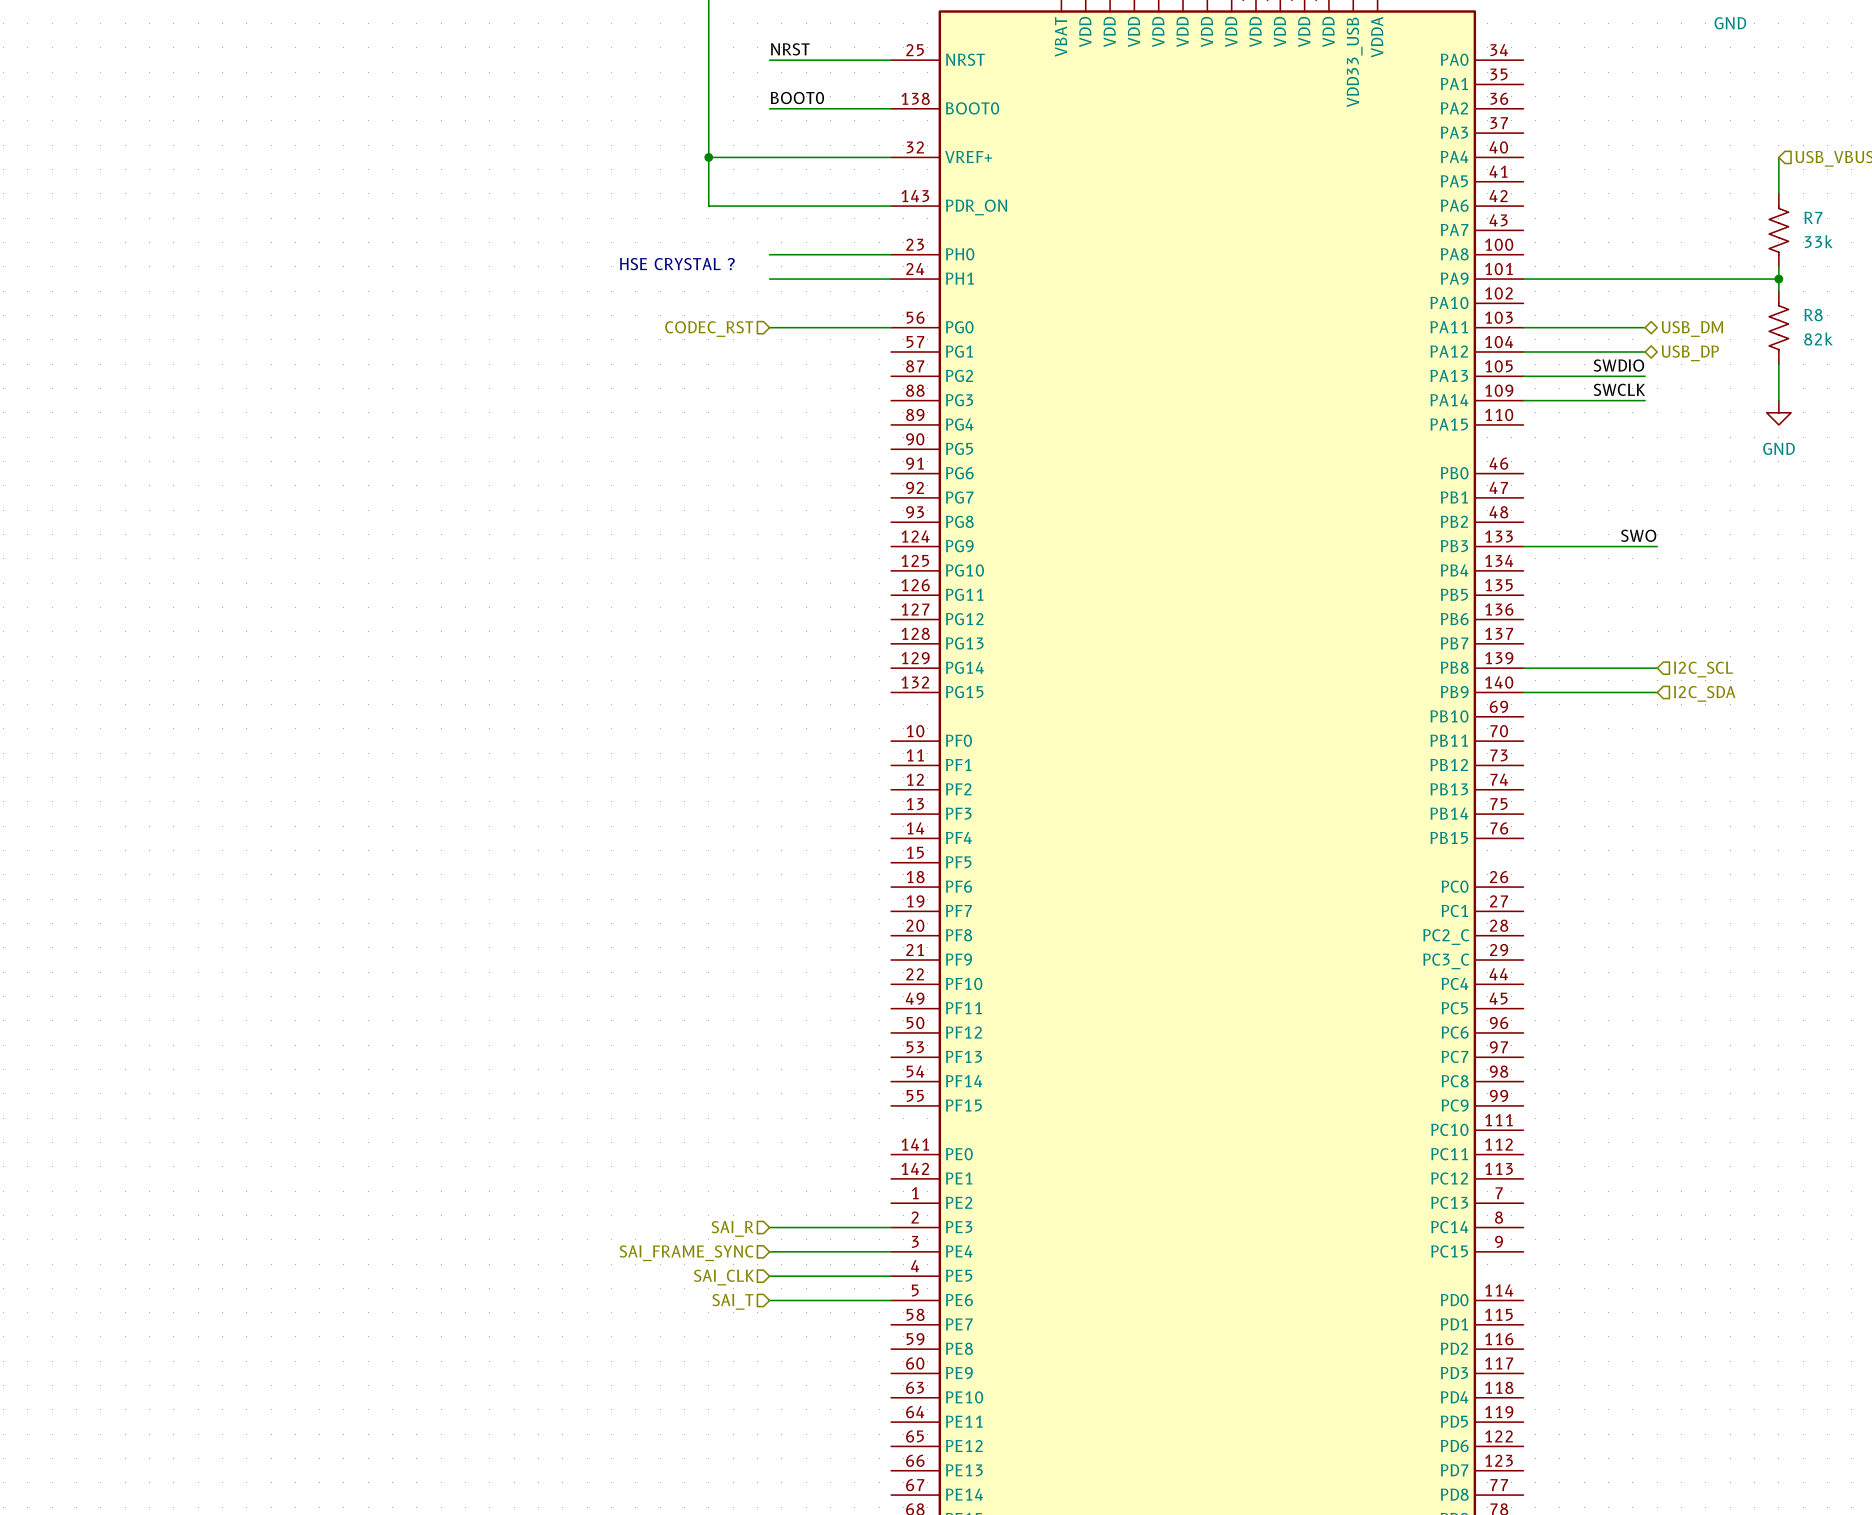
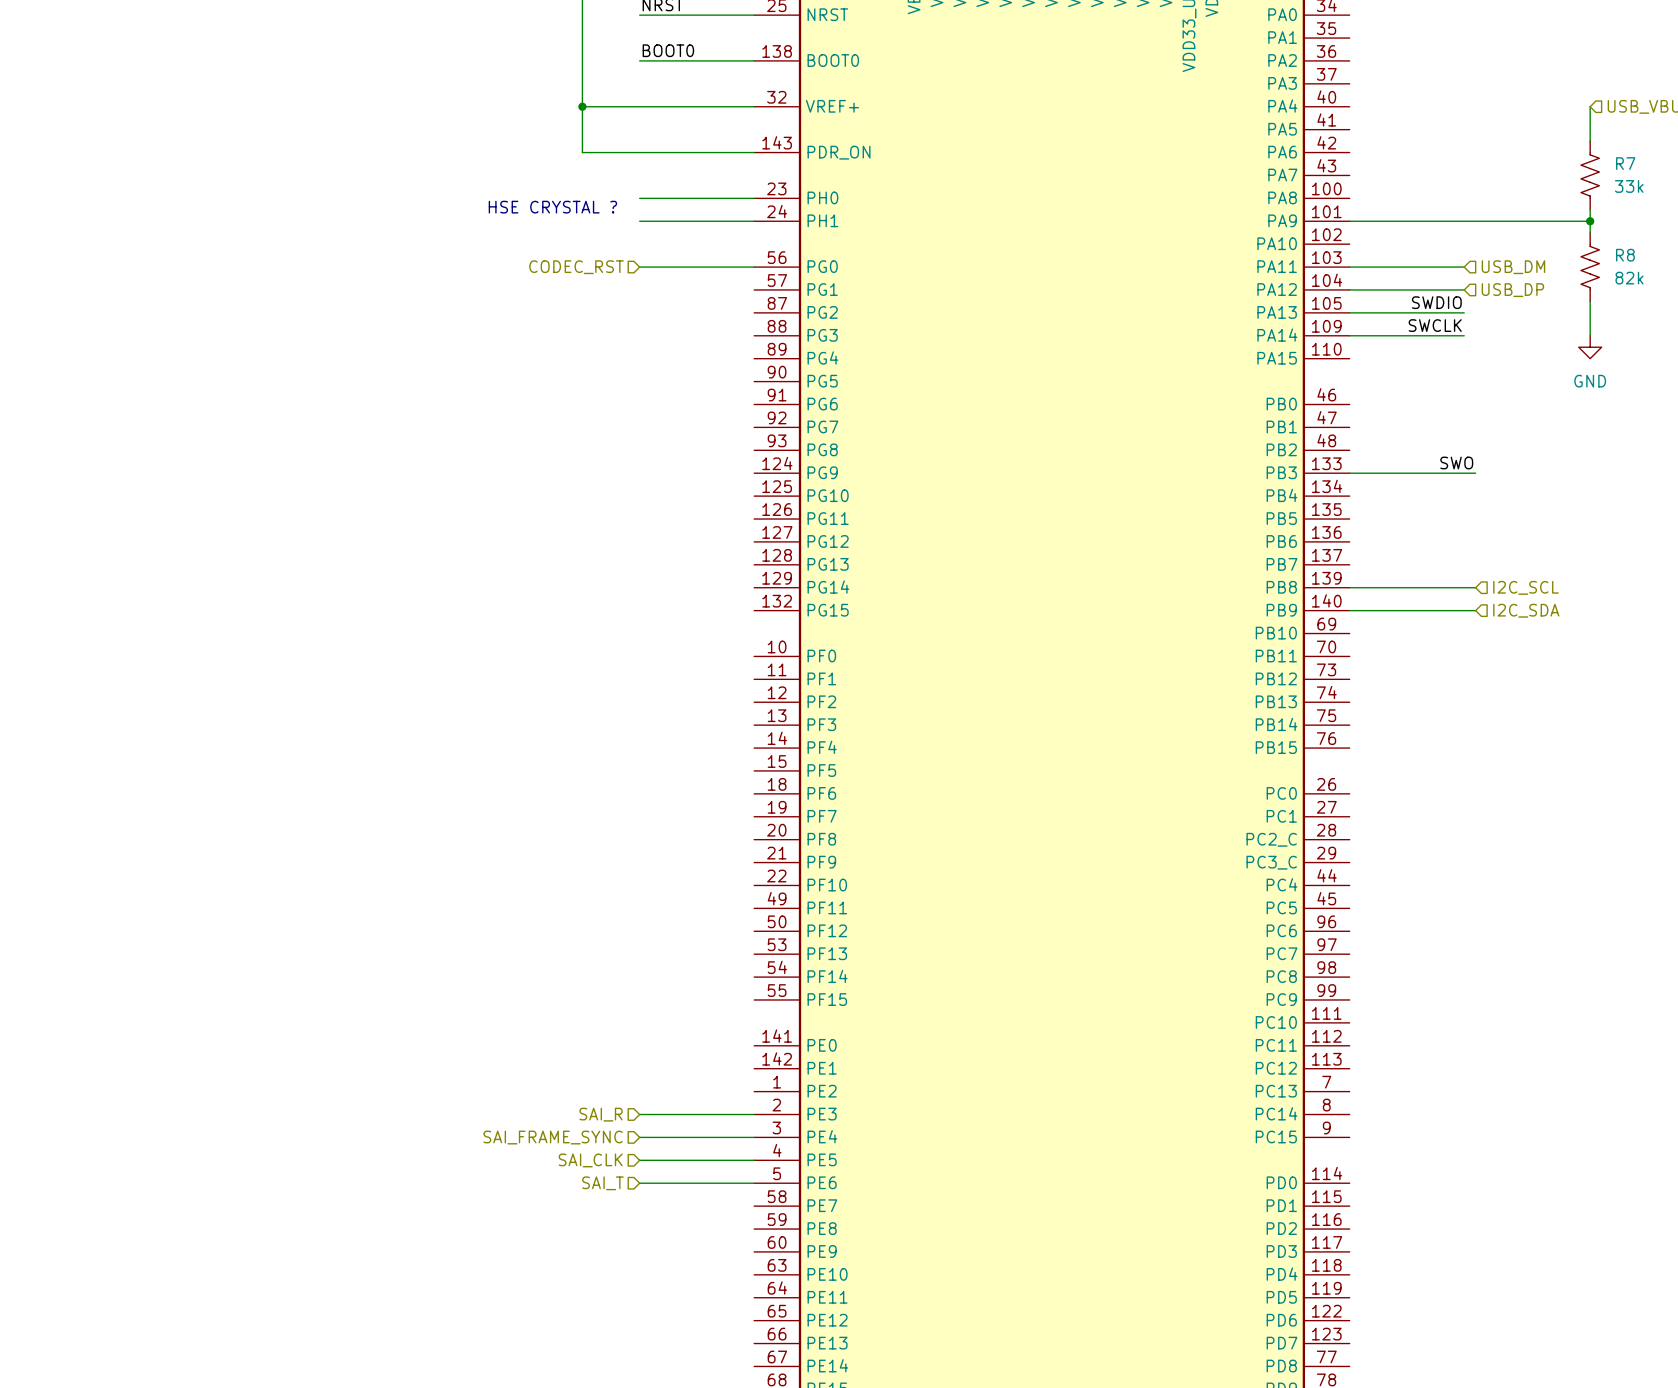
hierarchical label shape: bidirectional (1692, 329) -> input (1513, 267)
hierarchical label shape: bidirectional (1690, 353) -> input (1512, 290)

